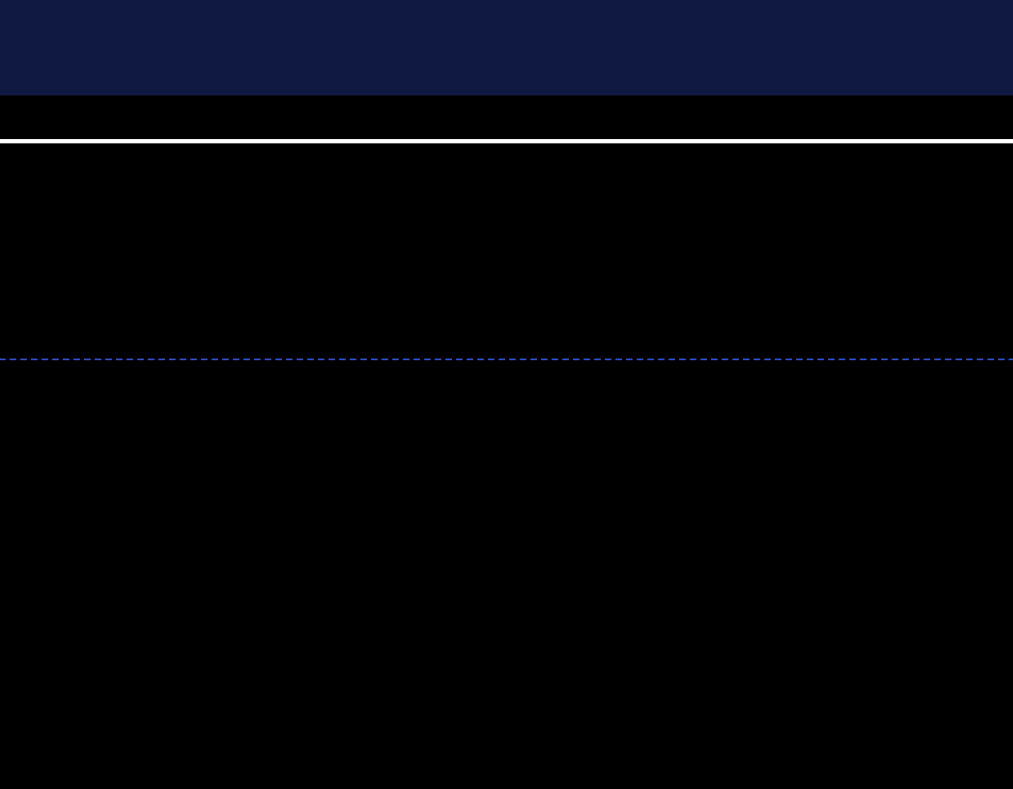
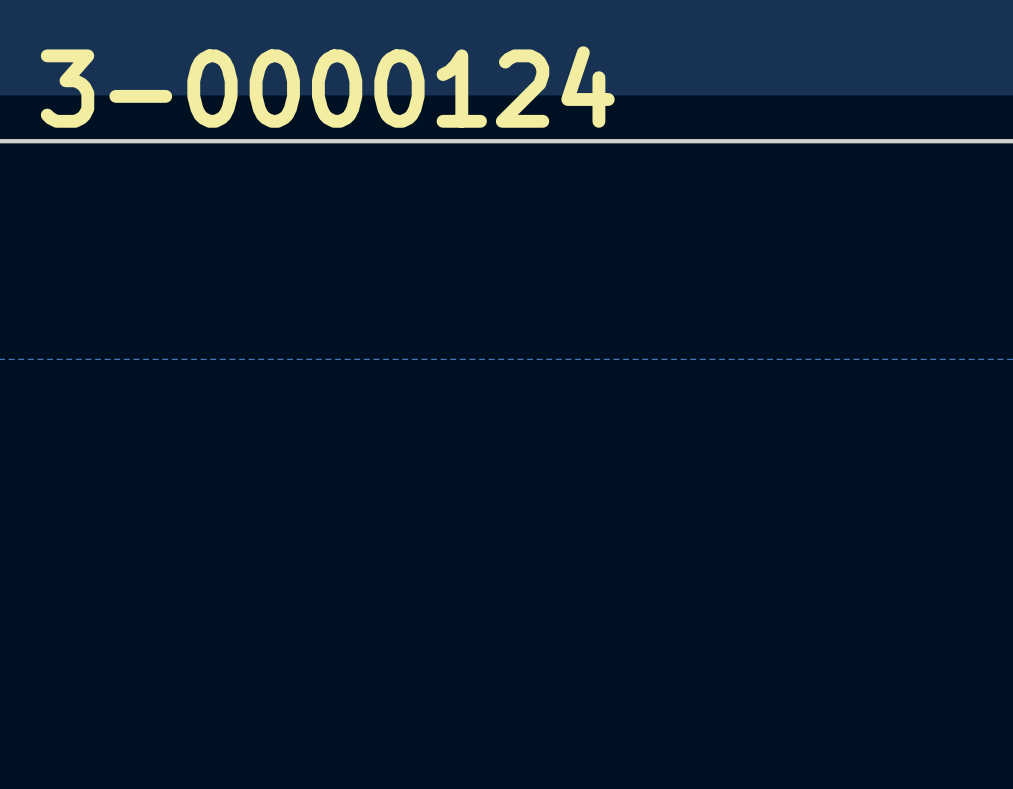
text: none -> 3-0000124 (327, 87)

